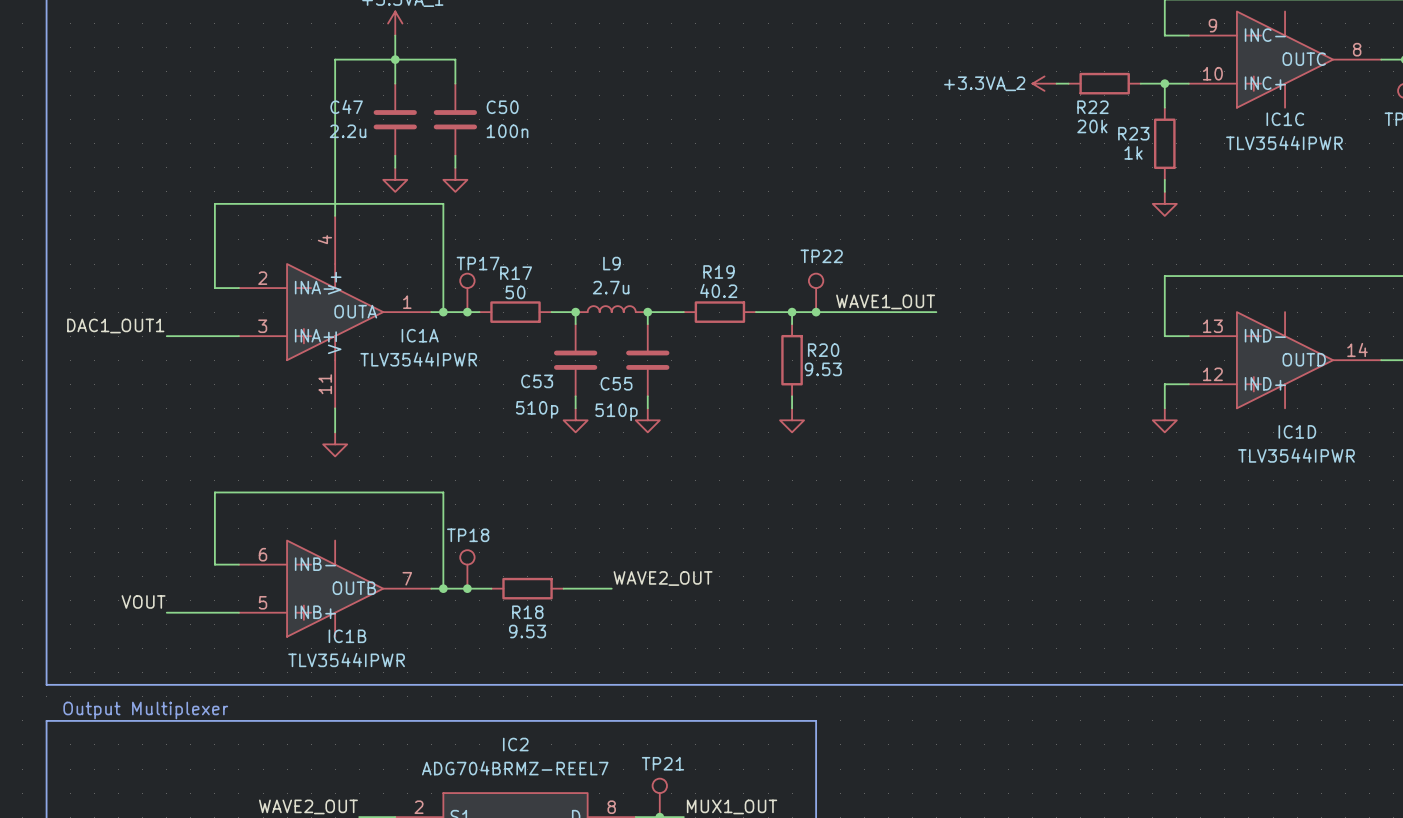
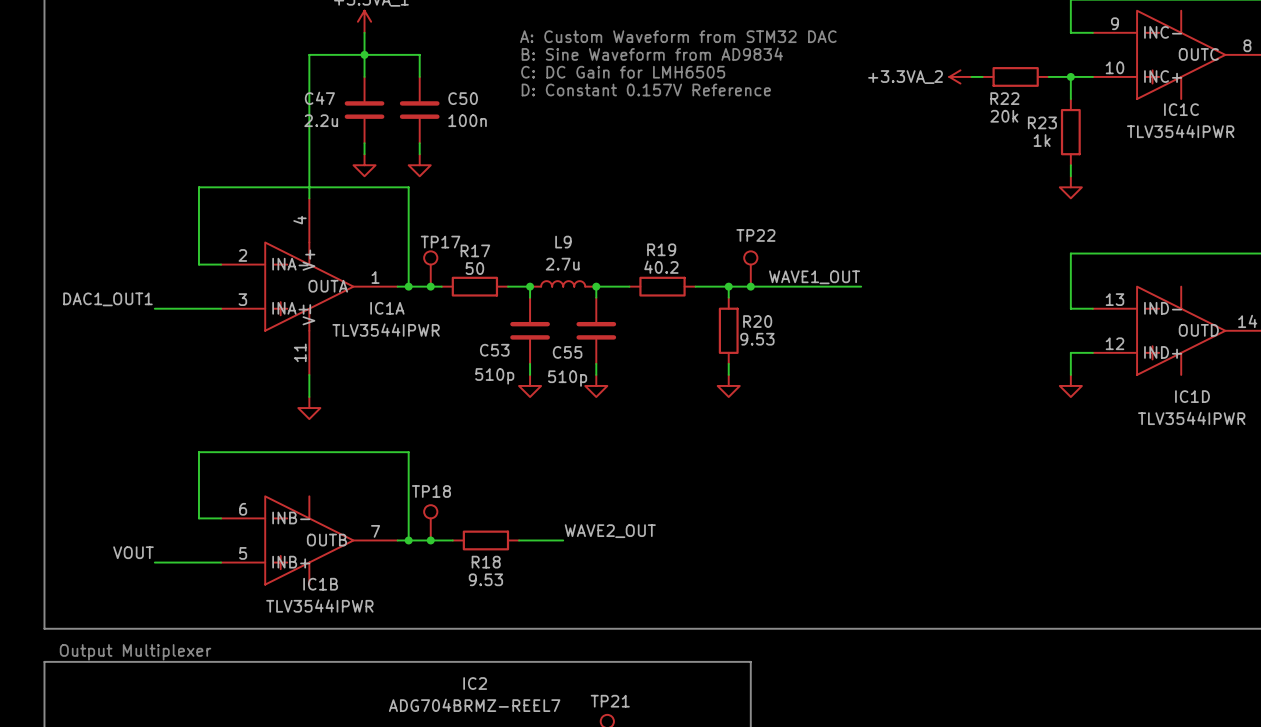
text: none -> A: Custom Waveform from STM32 DAC (678, 36)
text: none -> B: Sine Waveform from AD9834 (652, 54)
text: none -> C: DC Gain for LMH6505 (623, 72)
text: none -> D: Constant 0.157V Reference (646, 89)

